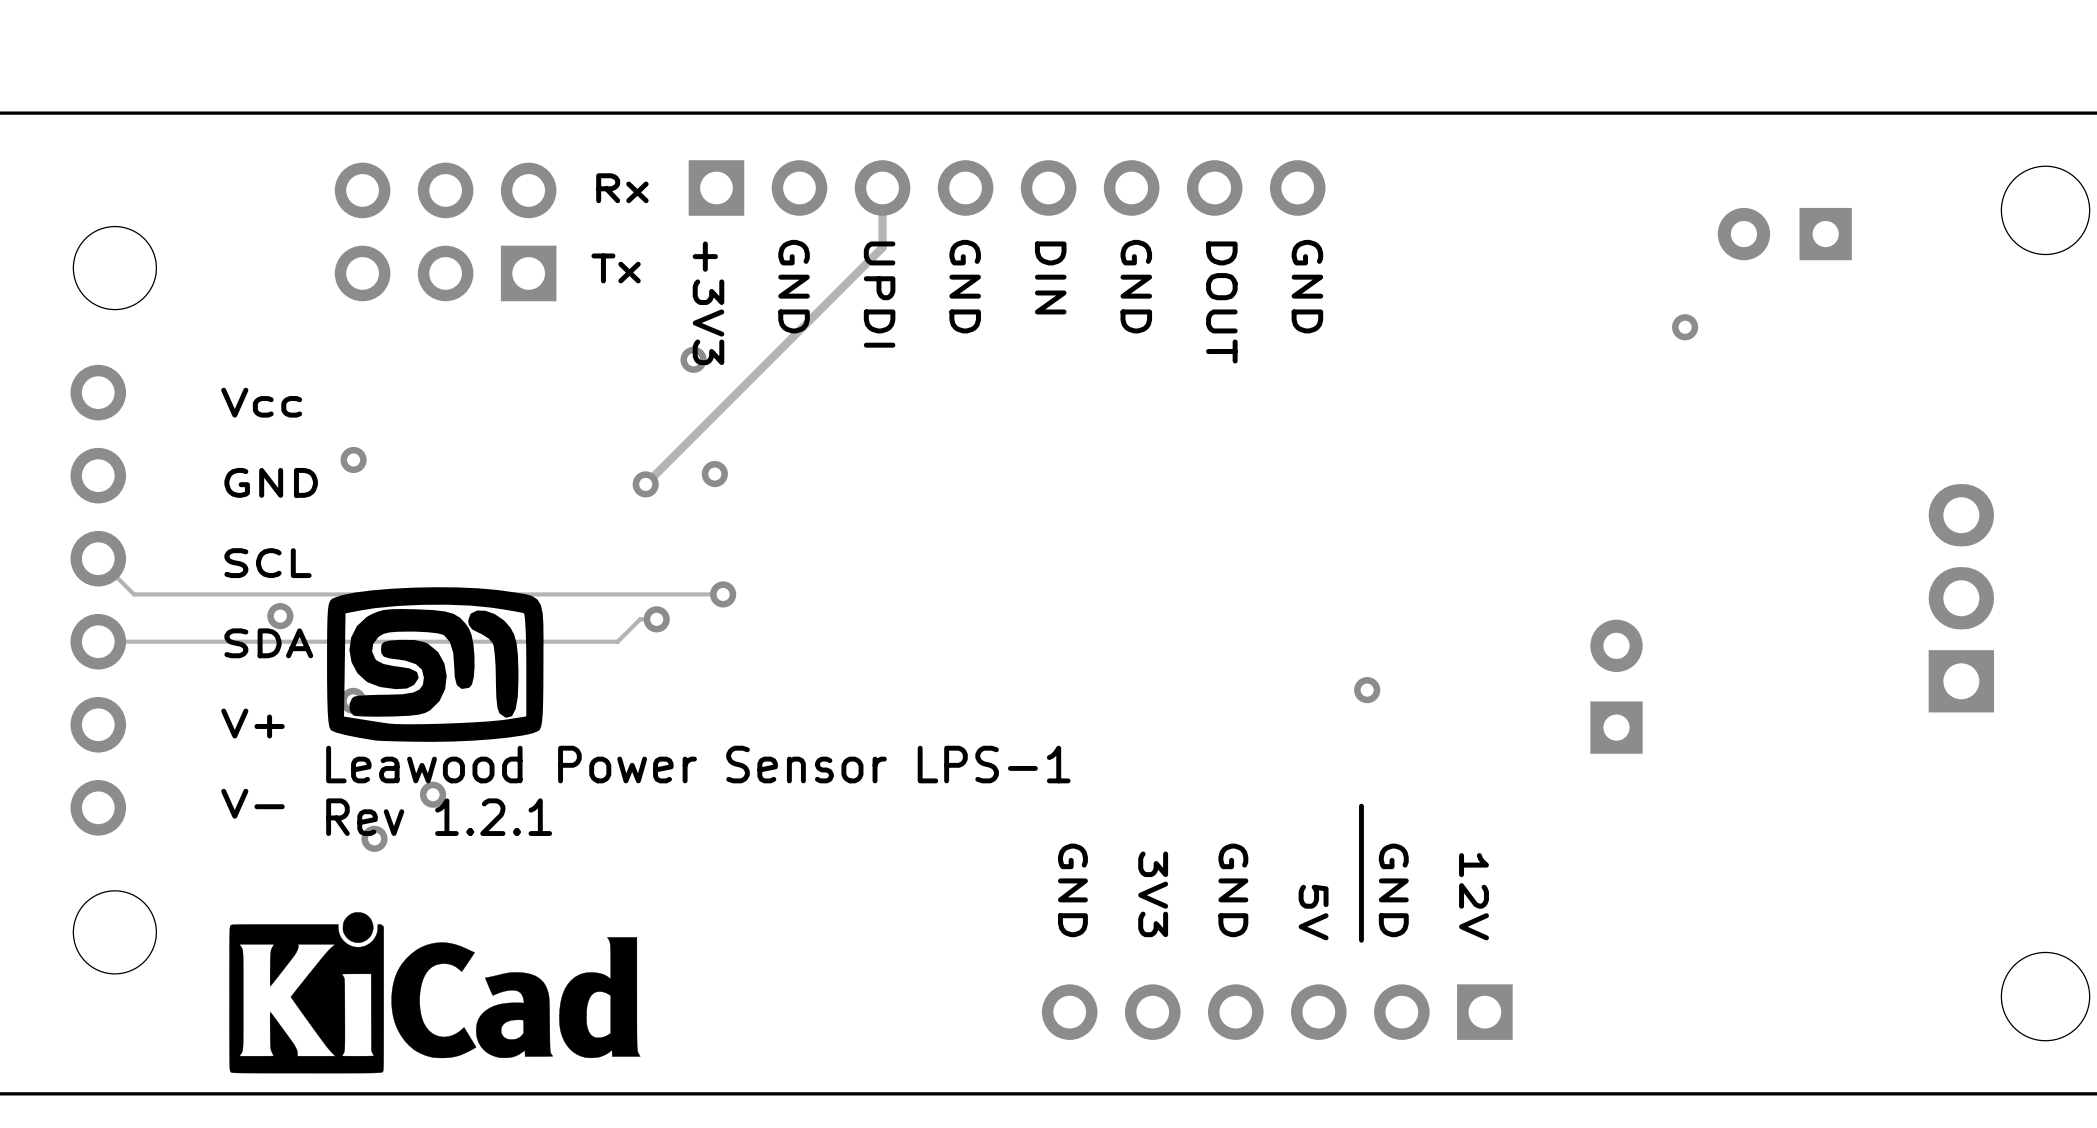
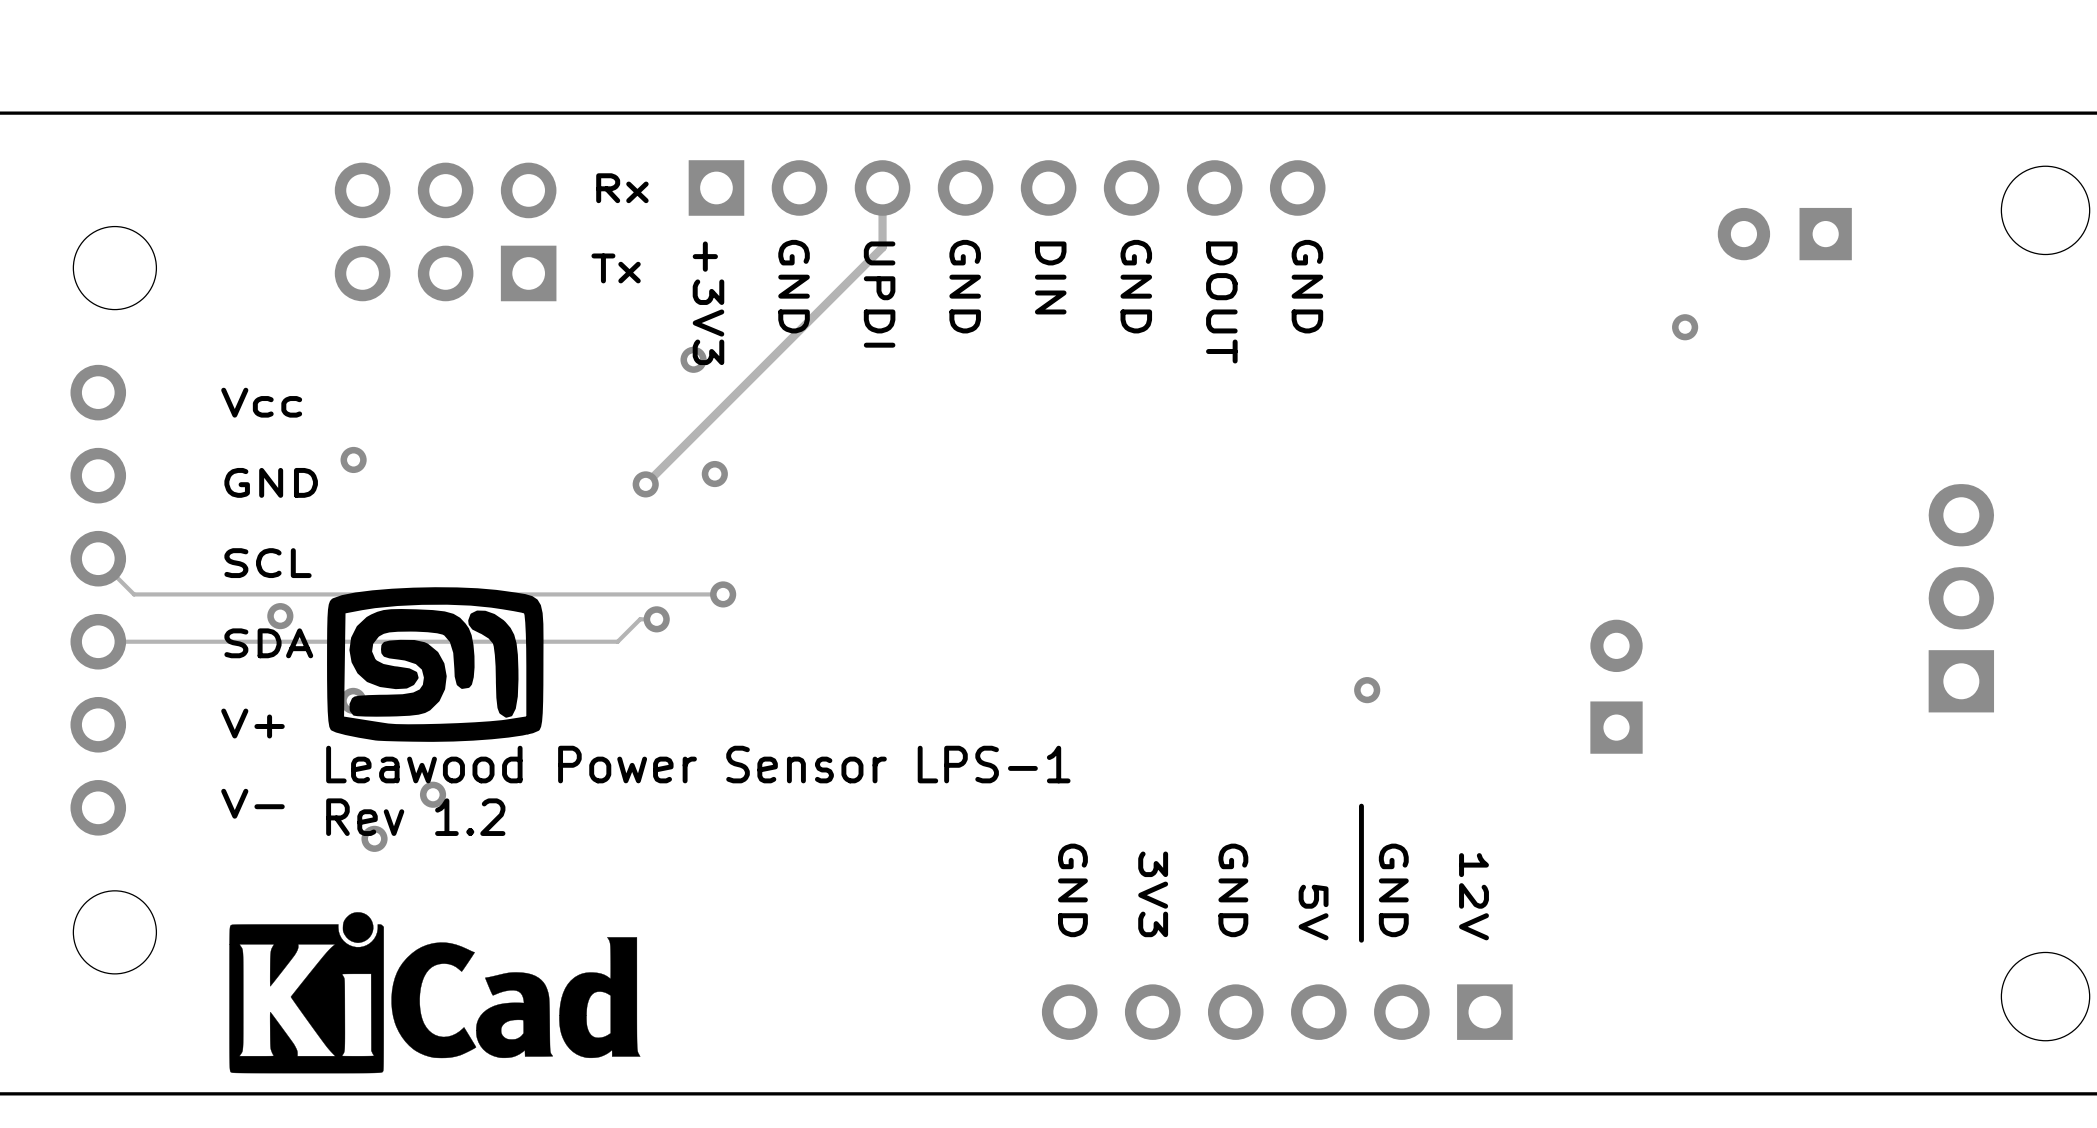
text: Rev 1.2.1 (439, 817) -> Rev 1.2 (415, 817)

